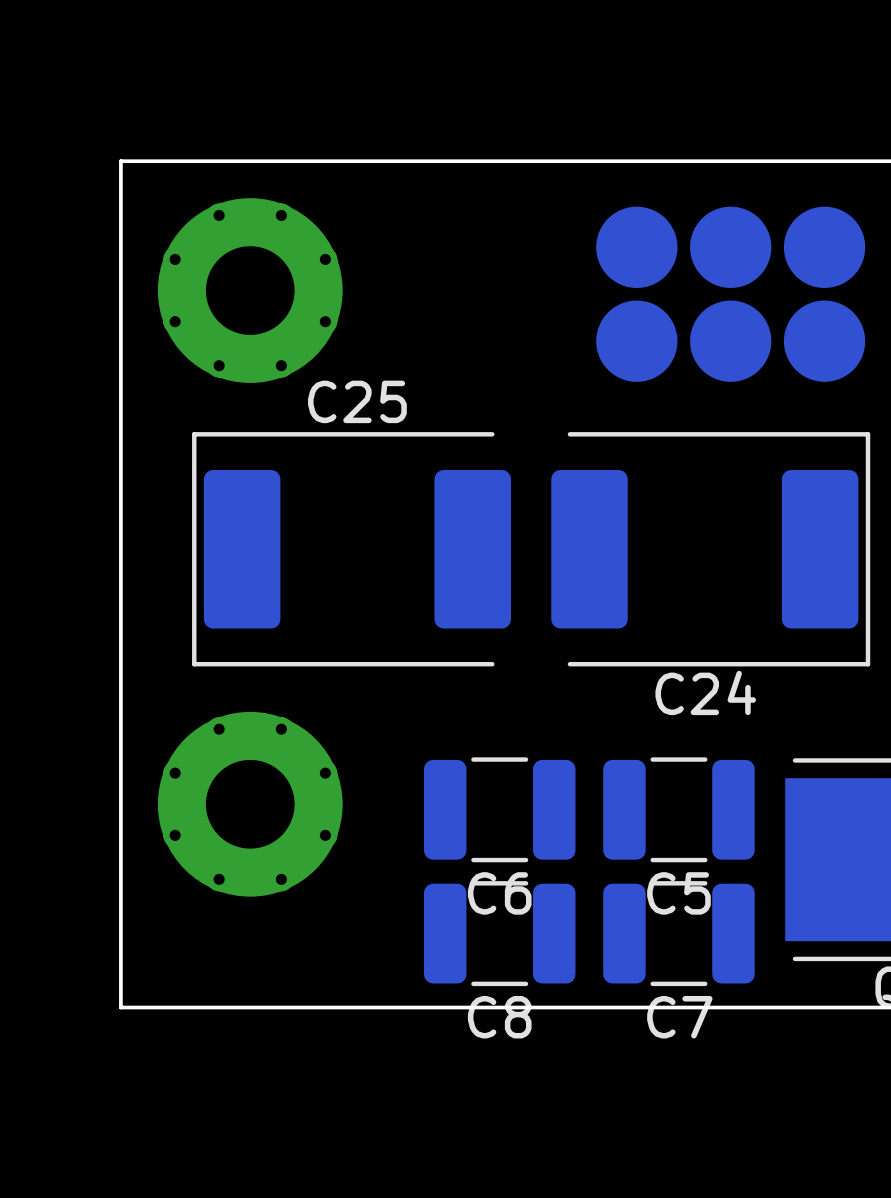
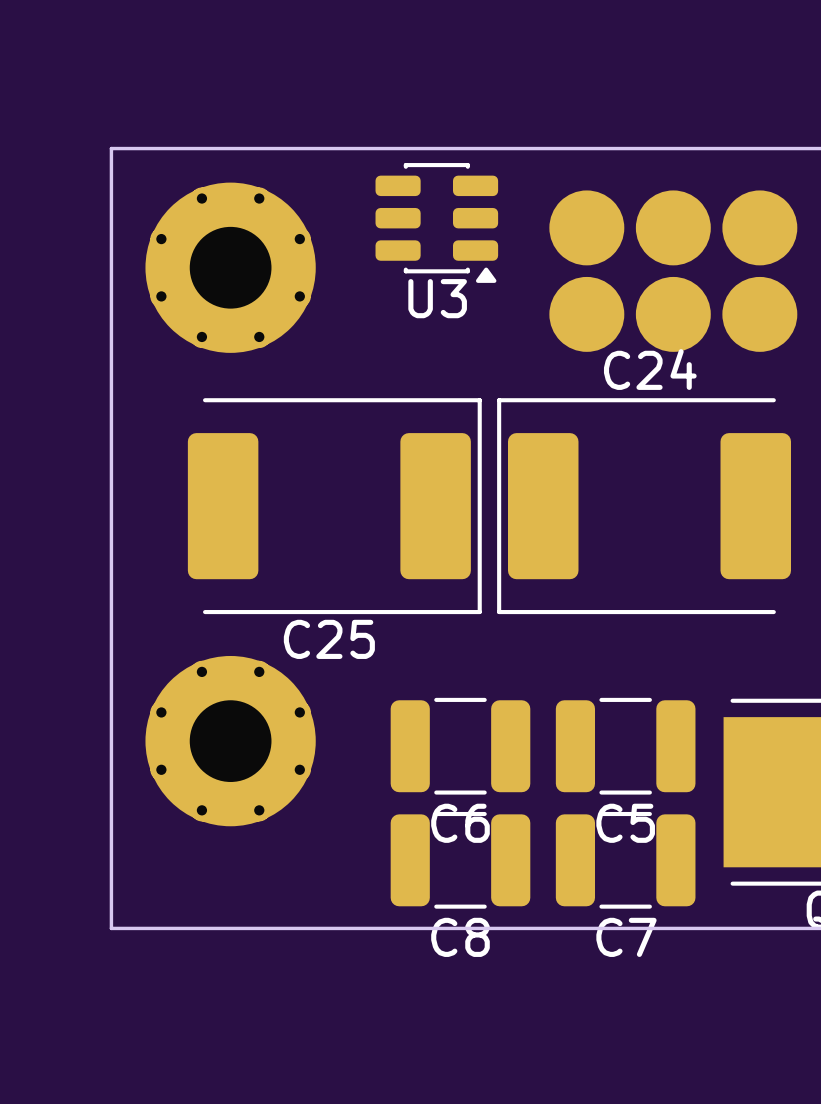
U3: none -> (436, 222)
C25 rotation: 0° (351, 549) -> 180° (334, 506)
C24 rotation: 0° (710, 549) -> 180° (644, 506)

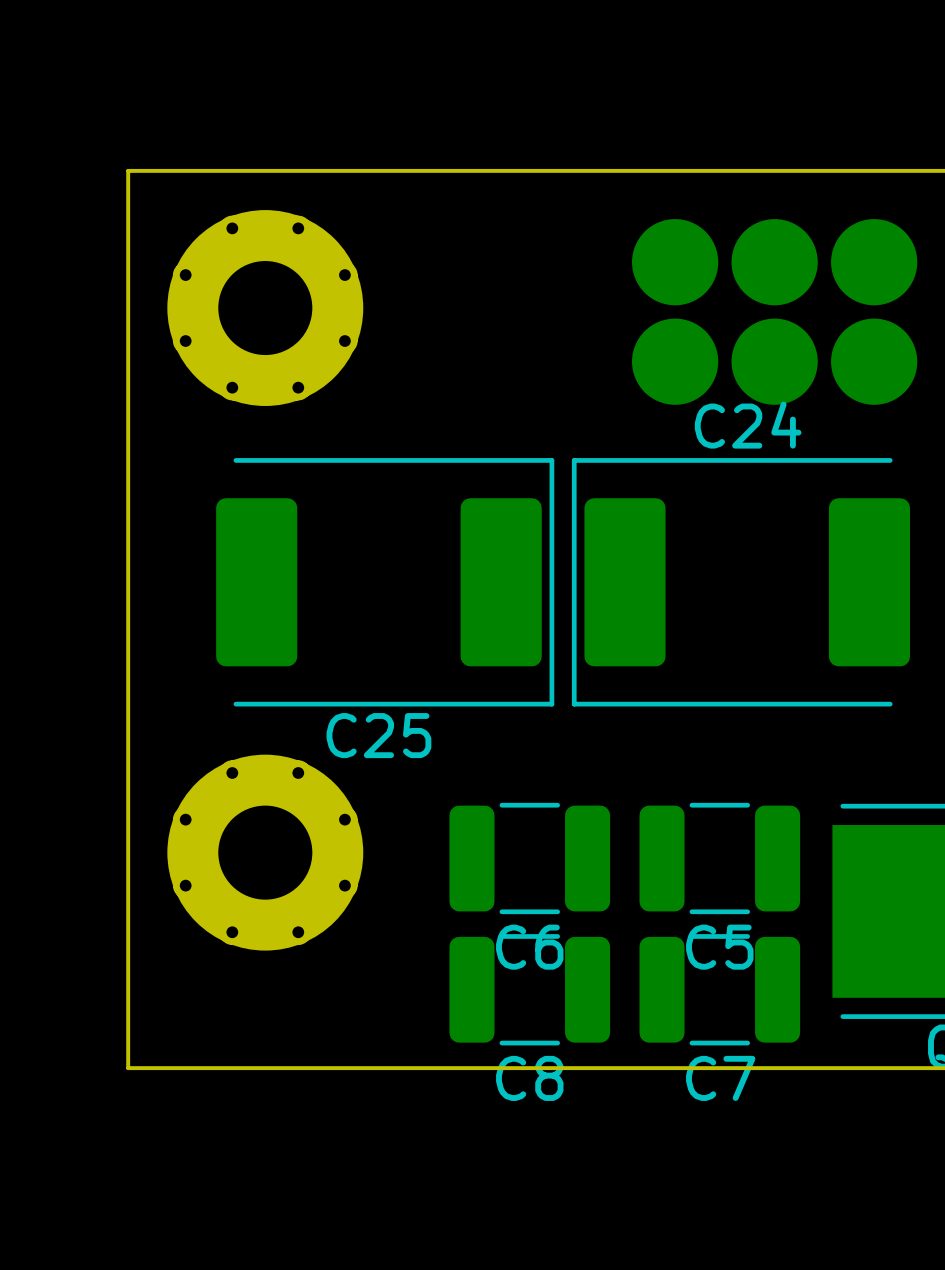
U3: (436, 222) -> none

